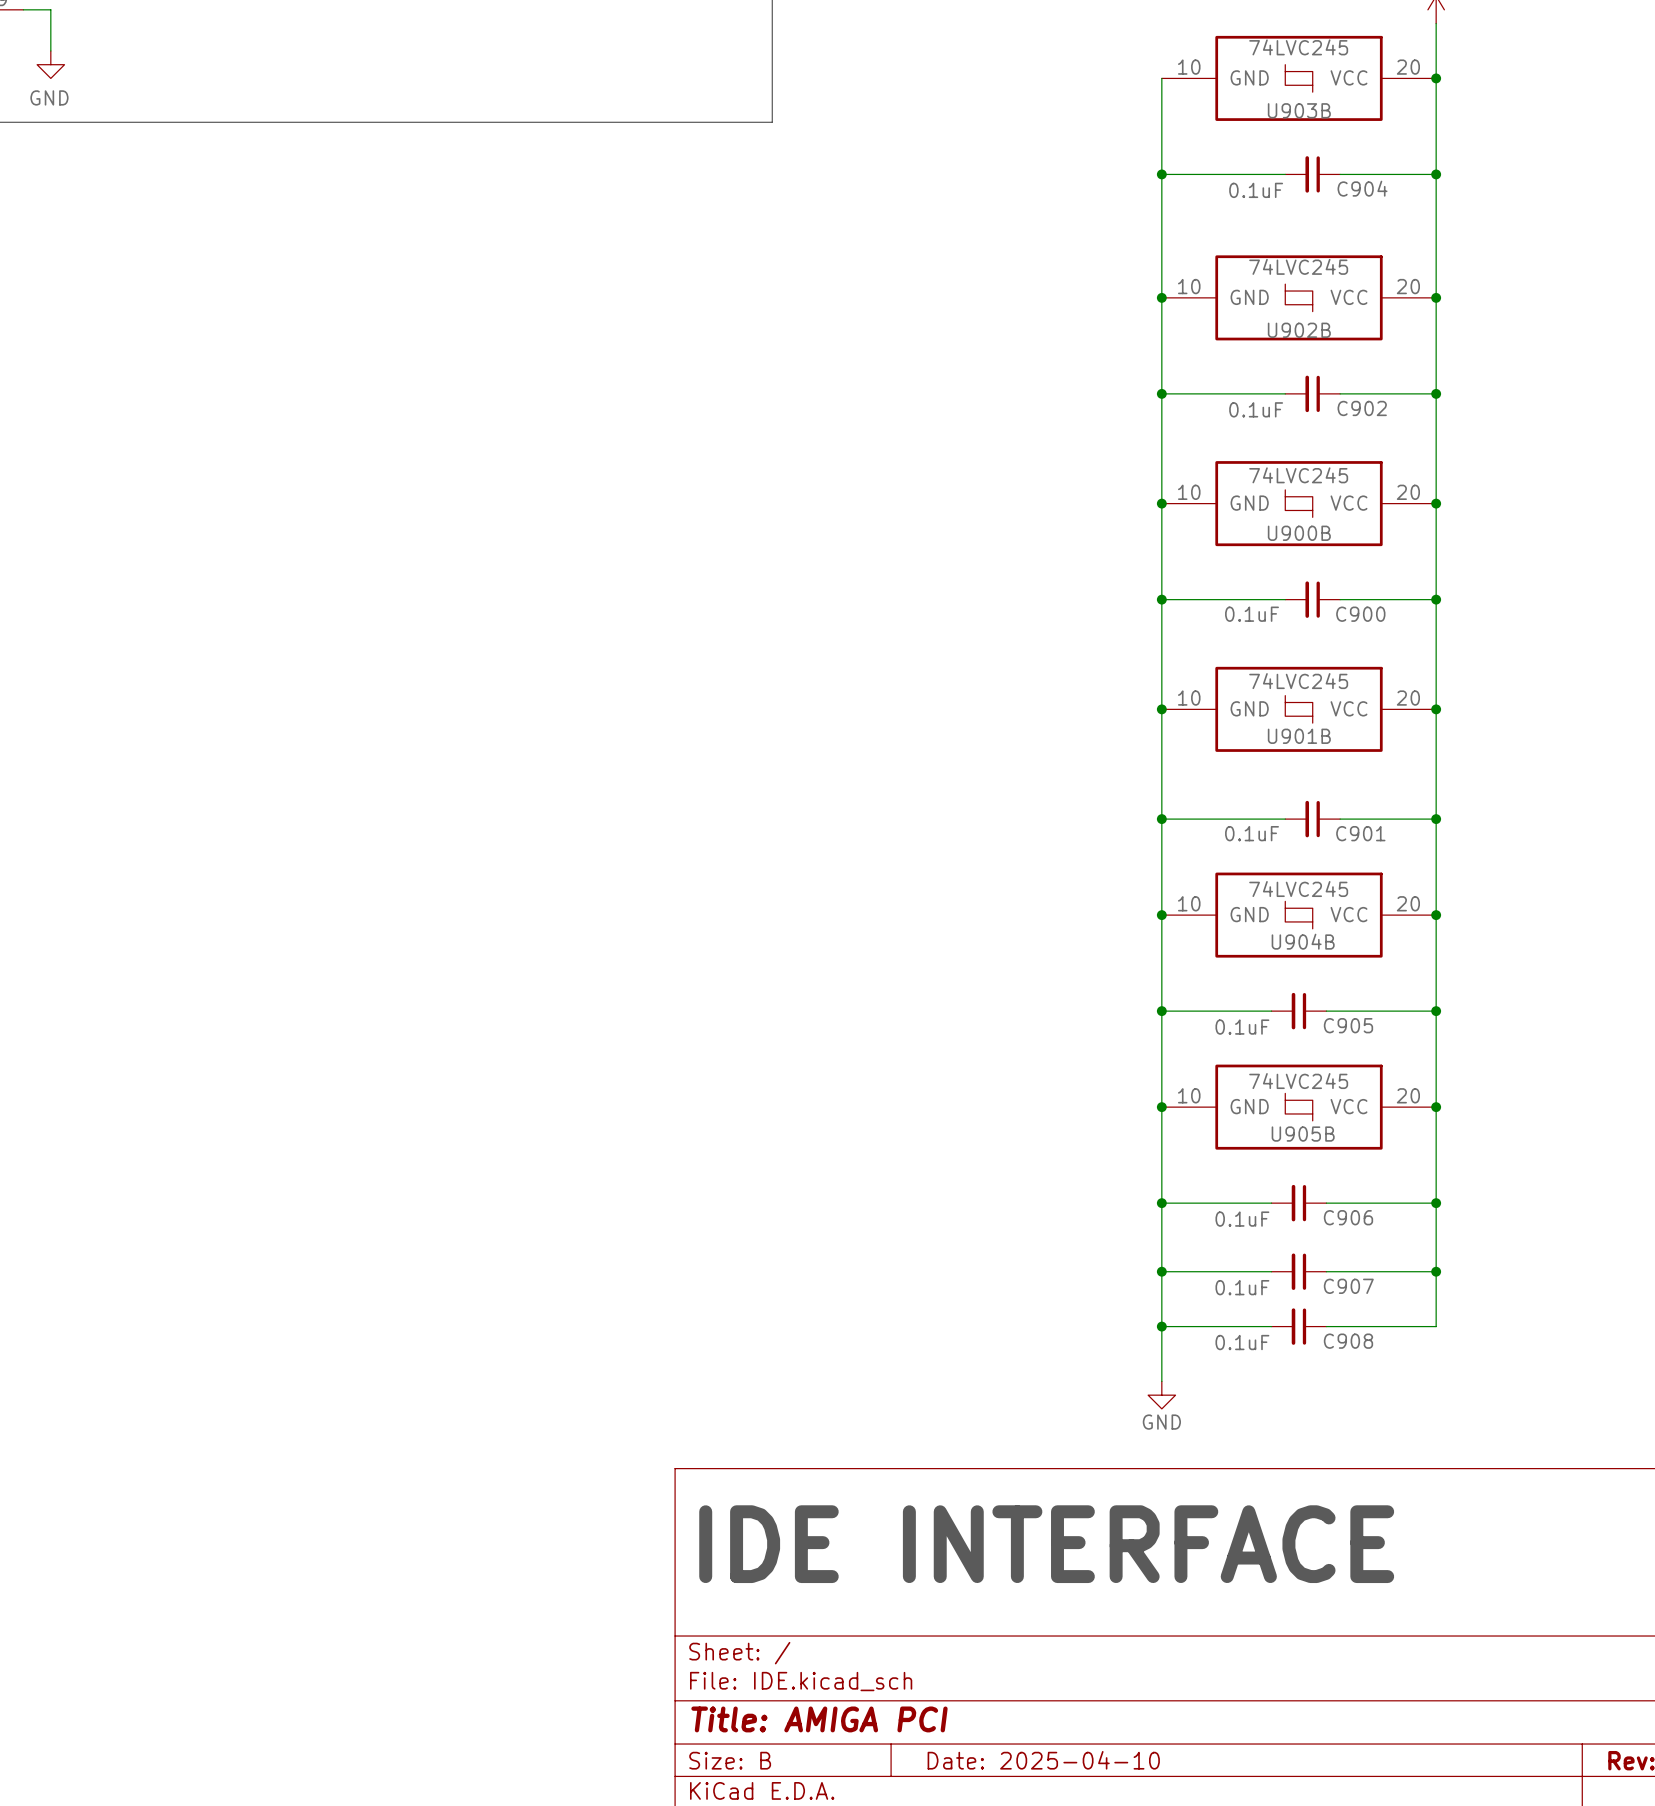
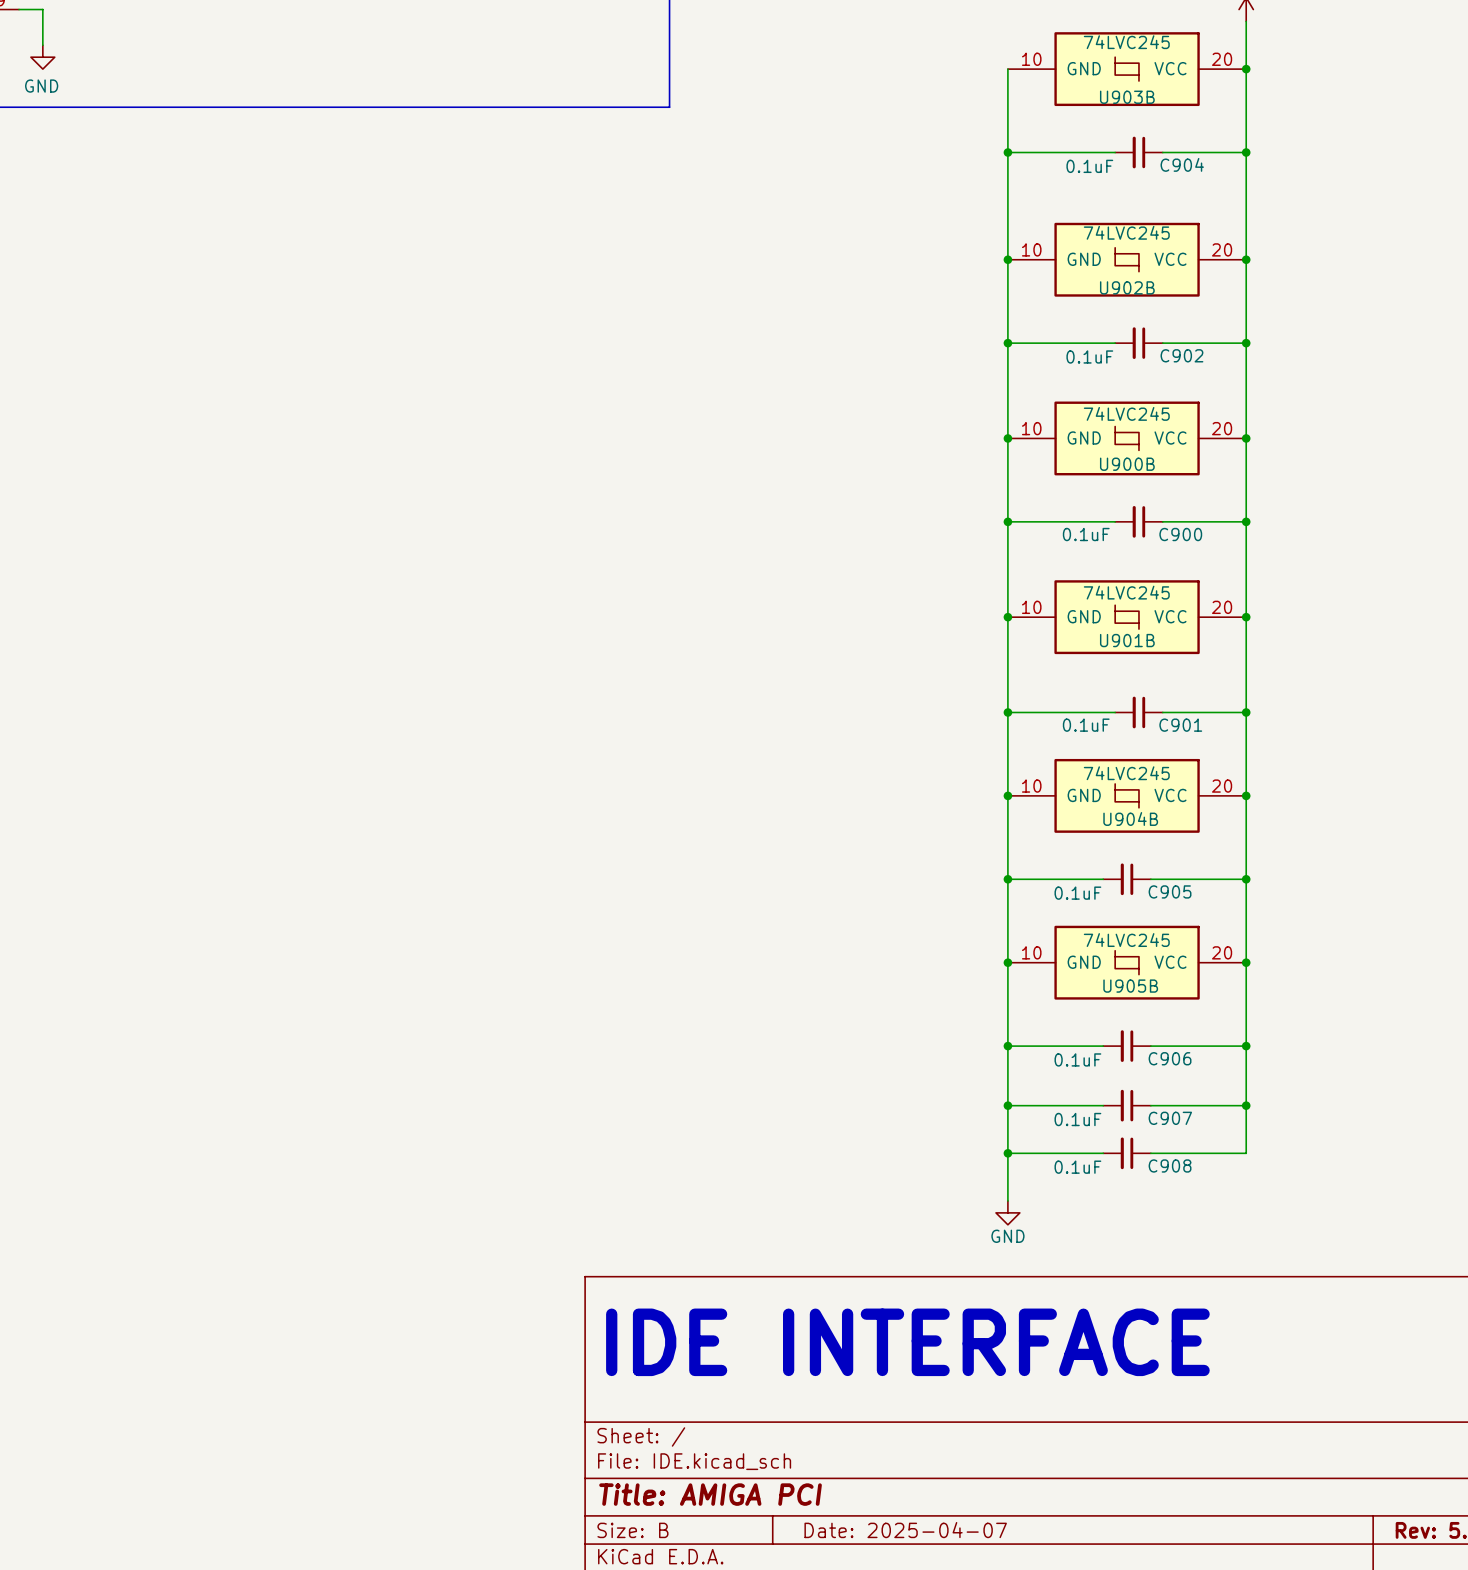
title block: Date: 2025-04-10 (1043, 1760) -> Date: 2025-04-07 (905, 1530)

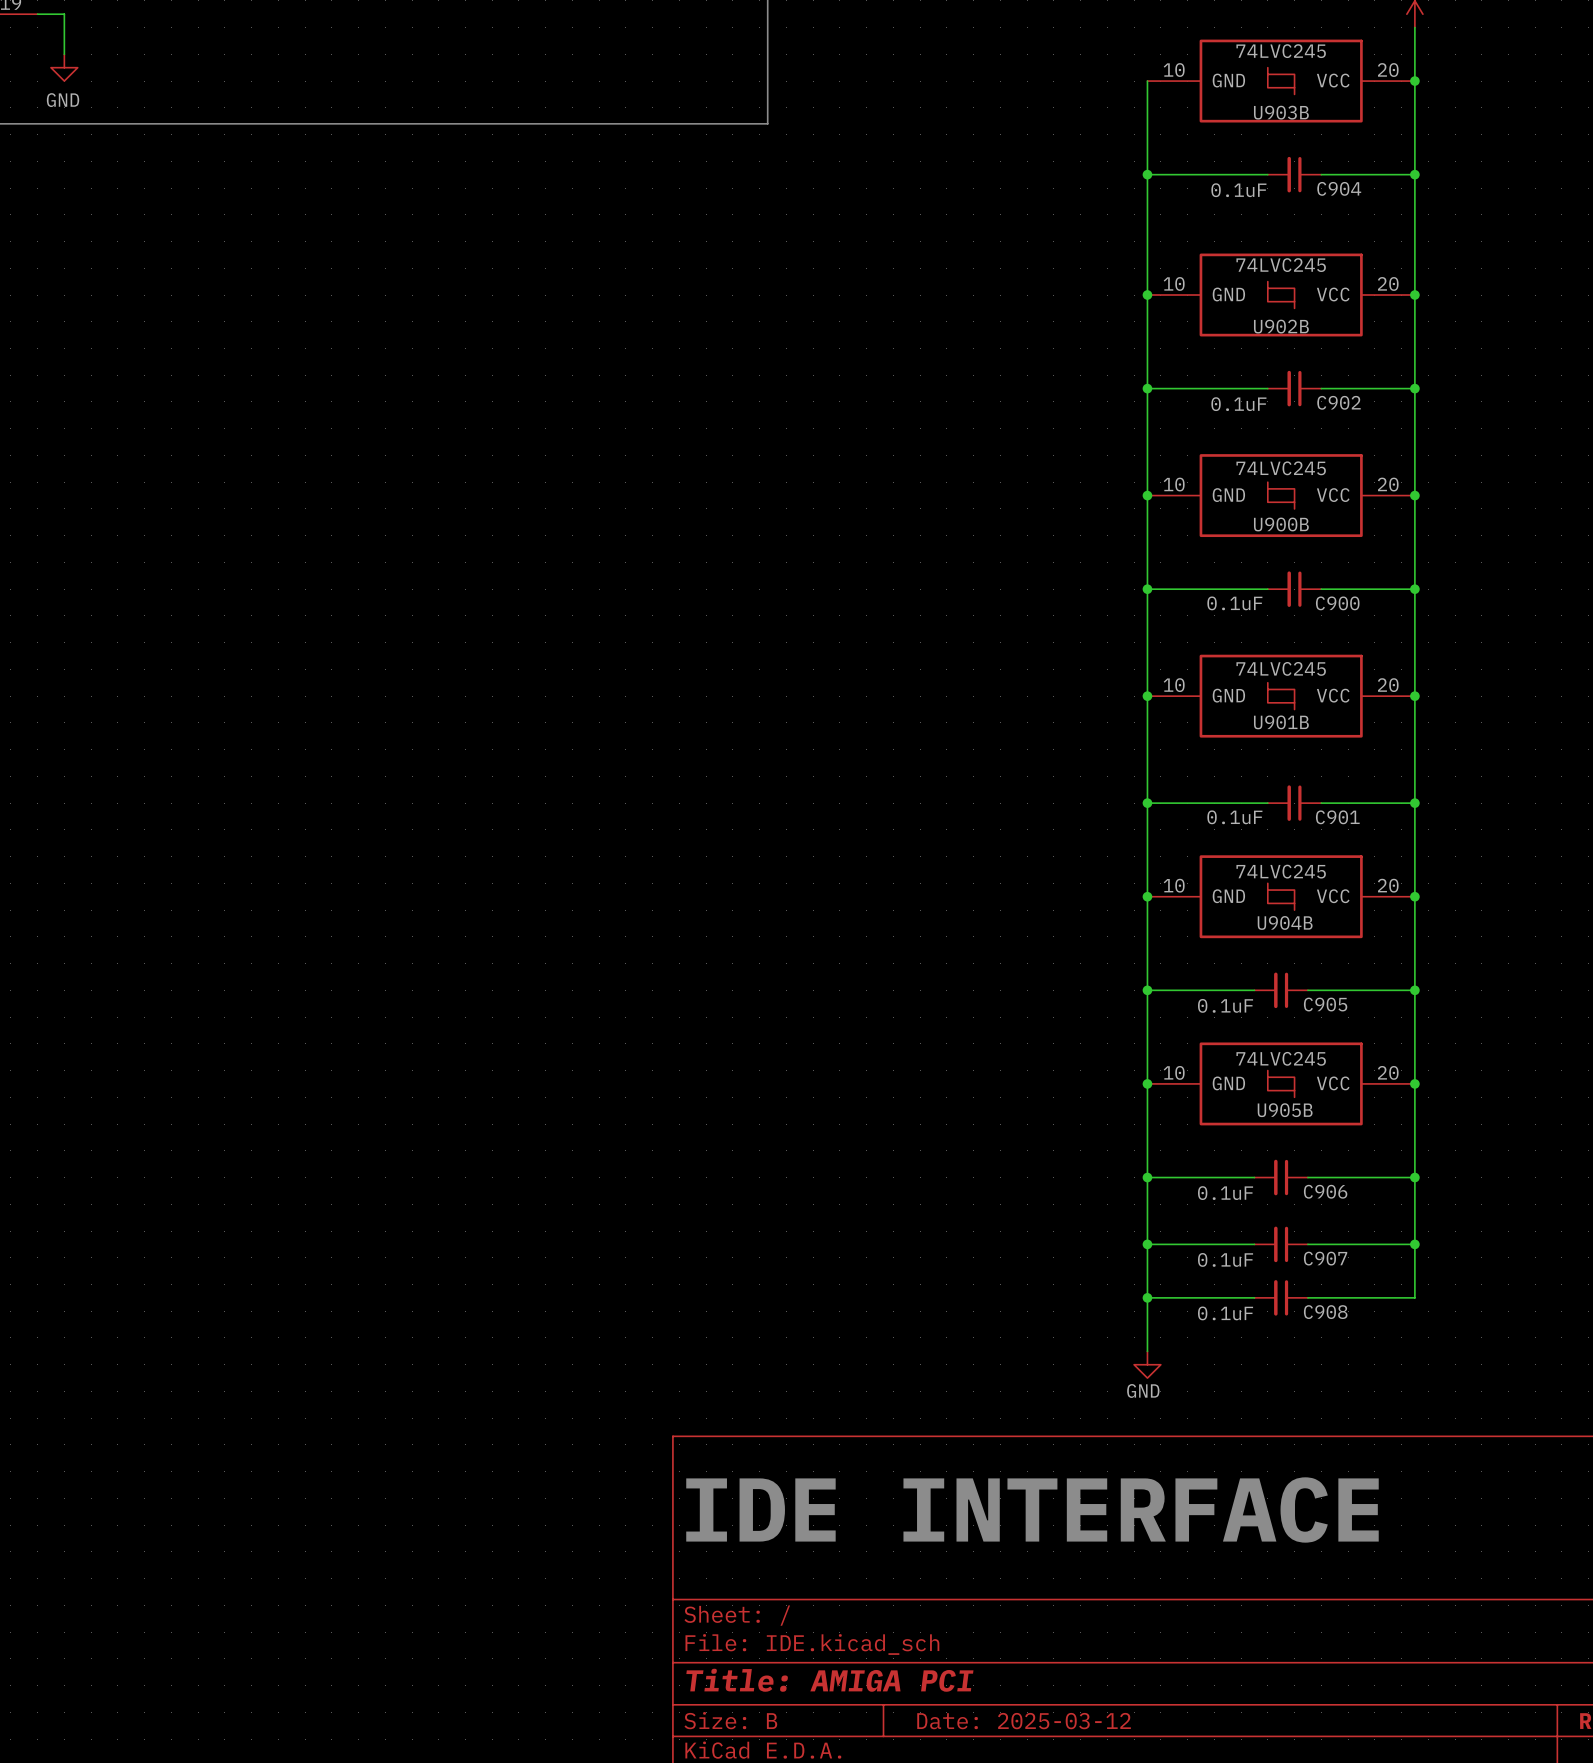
title block: Date: 2025-04-07 (905, 1530) -> Date: 2025-03-12 (1024, 1721)

